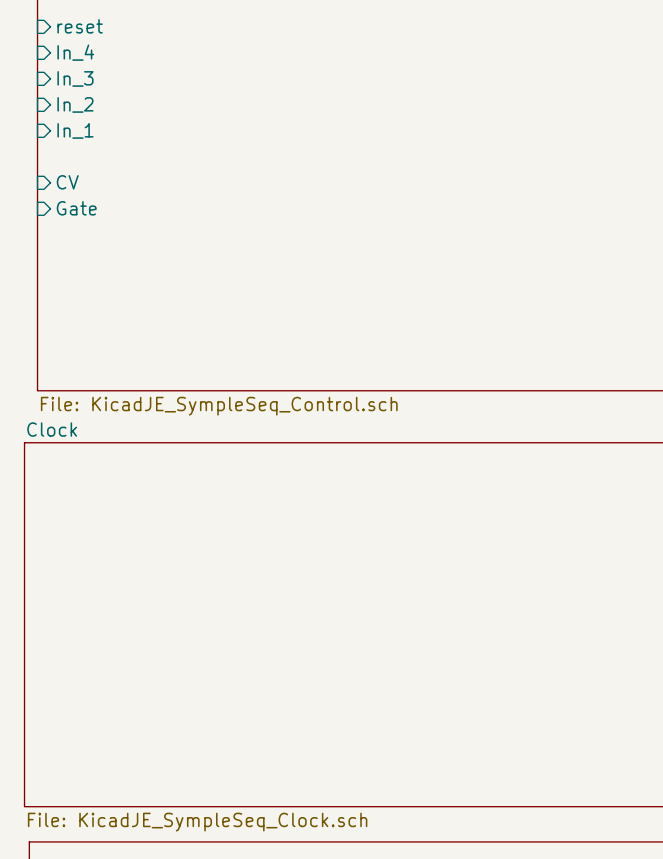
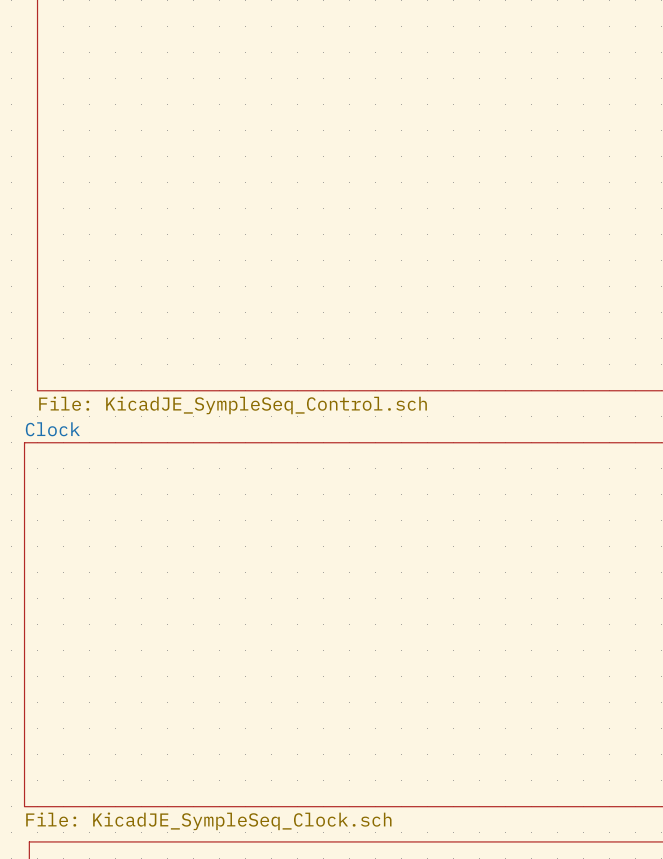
sheet pin: reset (80, 26) -> none
sheet pin: In_4 (75, 52) -> none
sheet pin: In_3 (75, 78) -> none
sheet pin: In_2 (75, 104) -> none
sheet pin: In_1 (75, 130) -> none
sheet pin: CV (67, 182) -> none
sheet pin: Gate (76, 208) -> none

